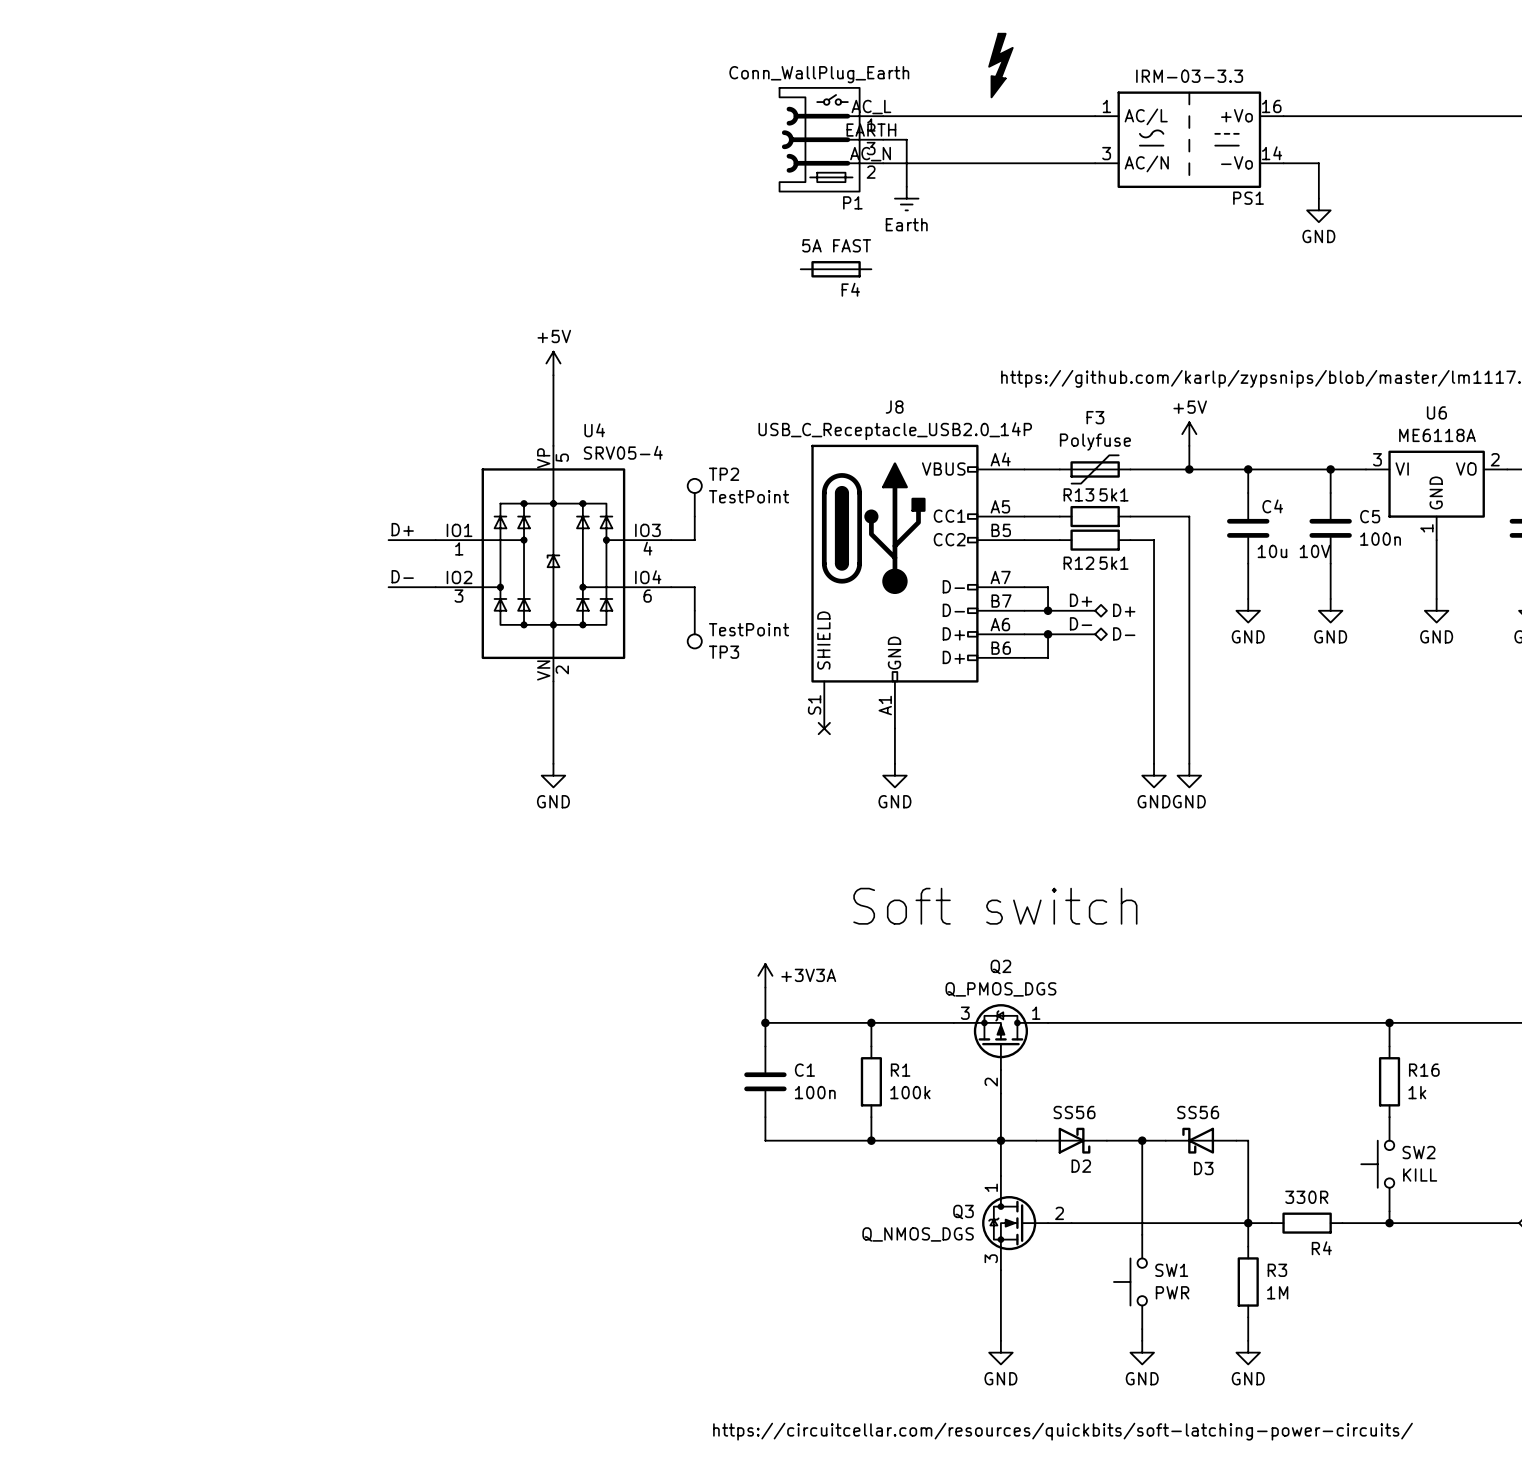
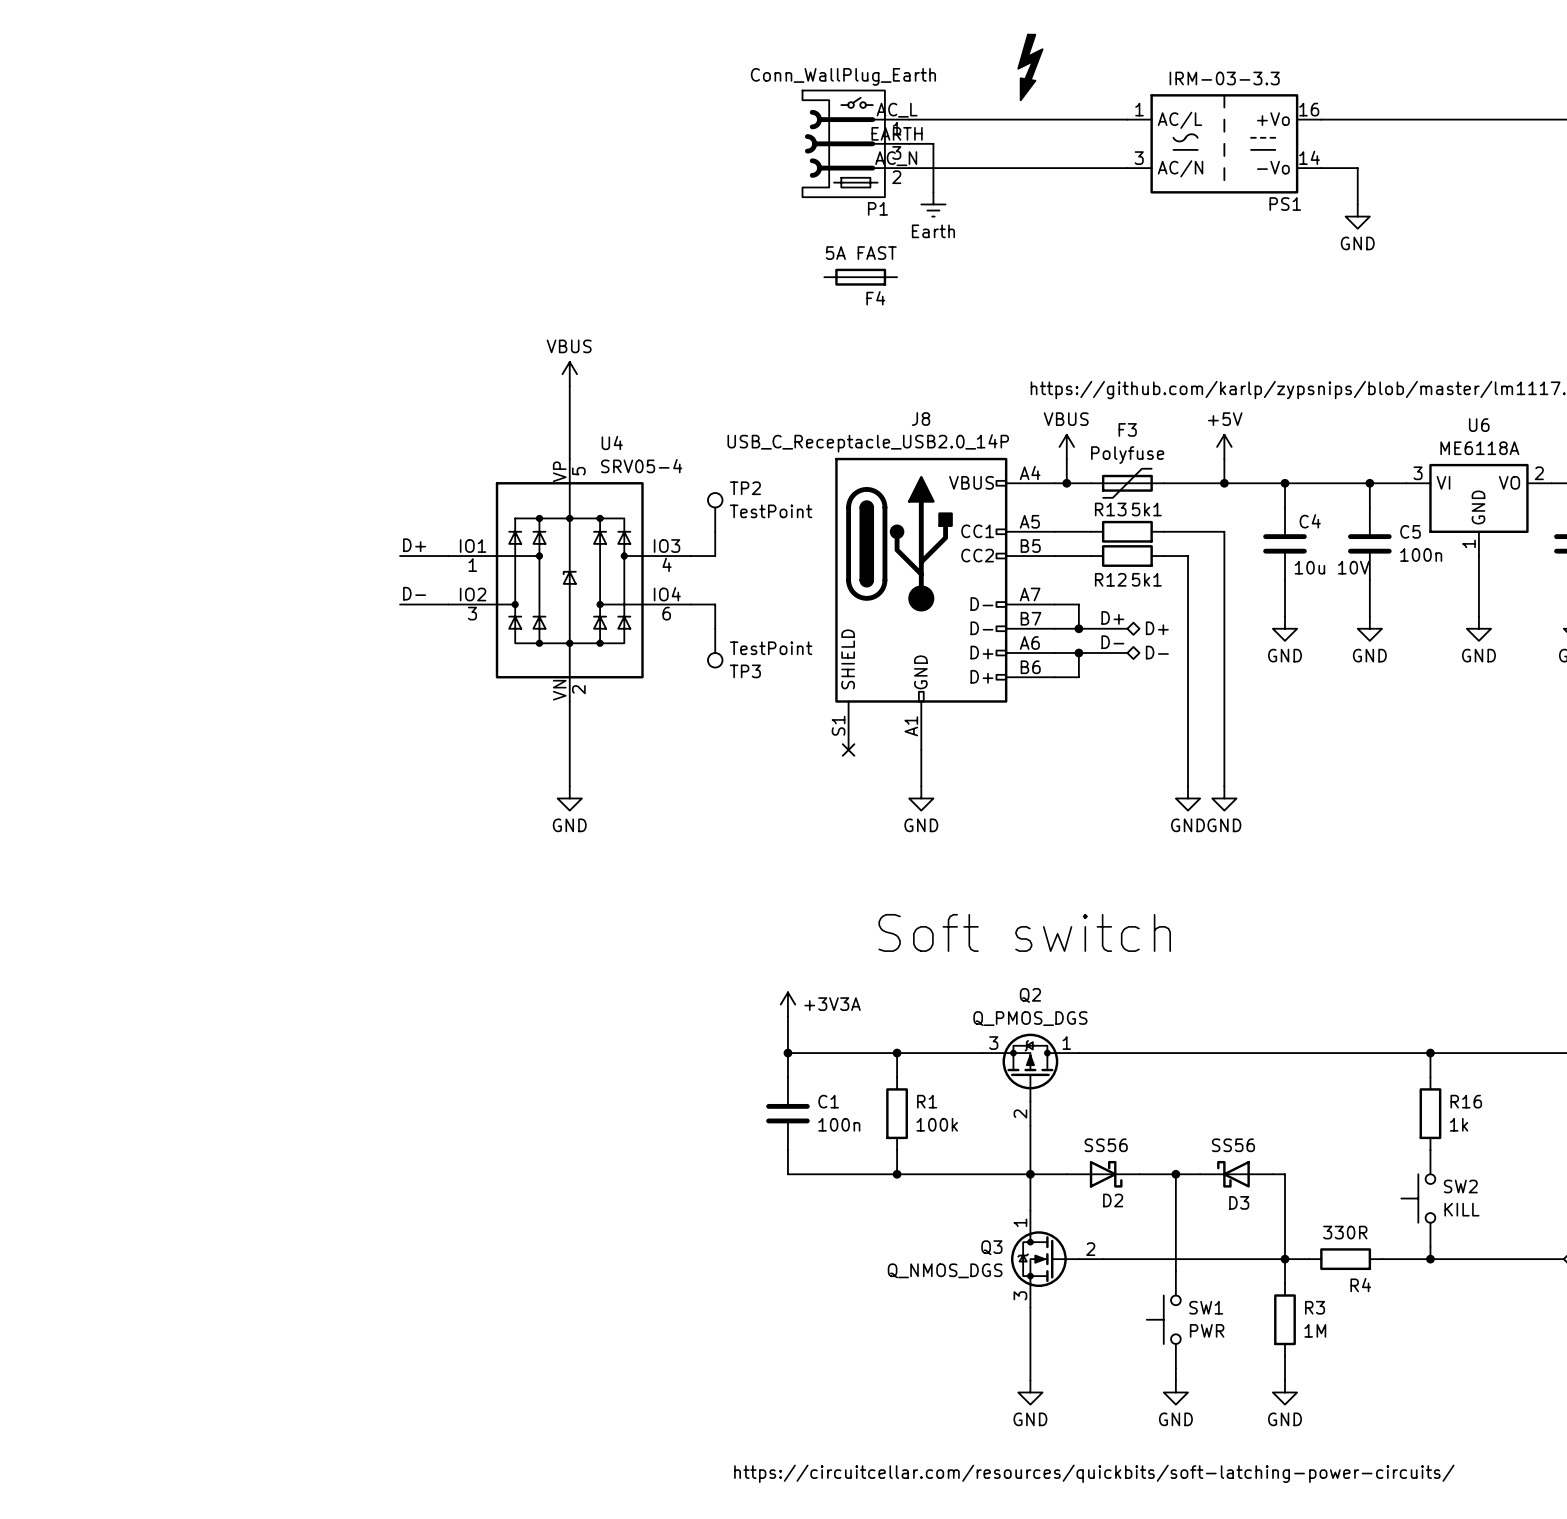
power symbol: +5V (553, 363) -> VBUS (569, 374)
J8 value position: USB_C_Receptacle_USB2.0_14P (895, 431) -> USB_C_Receptacle_USB2.0_14P (868, 443)
power symbol: none -> VBUS (1066, 446)
wire: none -> (1066, 459) (1066, 483)
junction: none -> (1066, 483)

